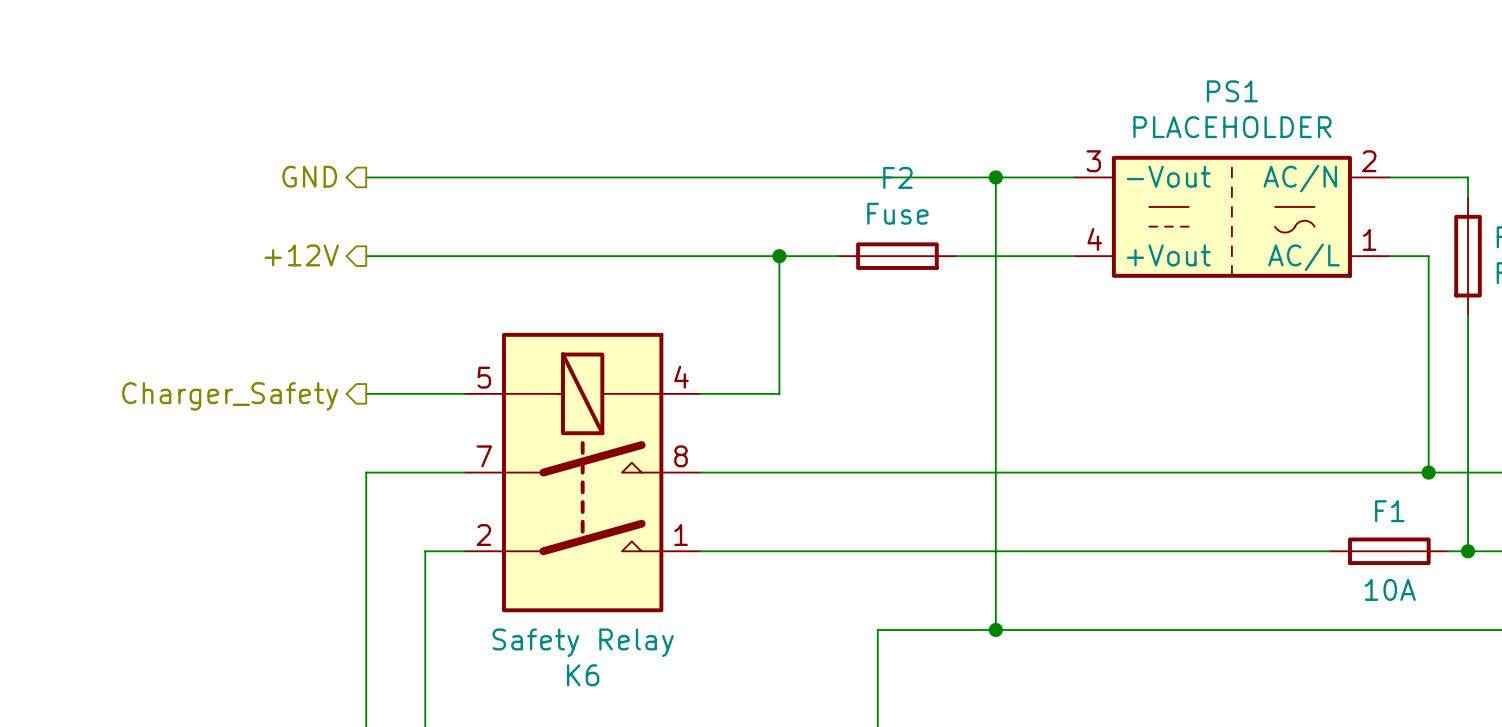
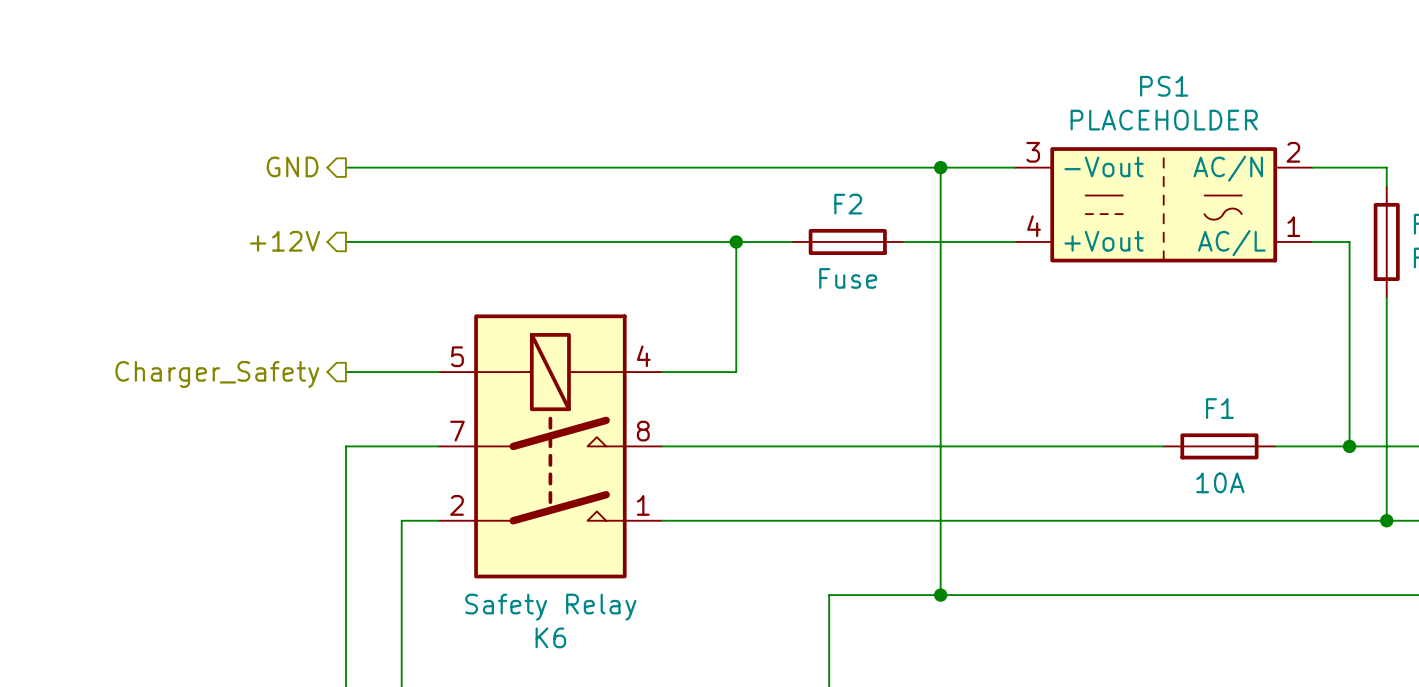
F2 name position: F2 (897, 177) -> F2 (848, 204)
F2 value position: Fuse (897, 213) -> Fuse (848, 278)
F1 position: (1389, 551) -> (1219, 446)

